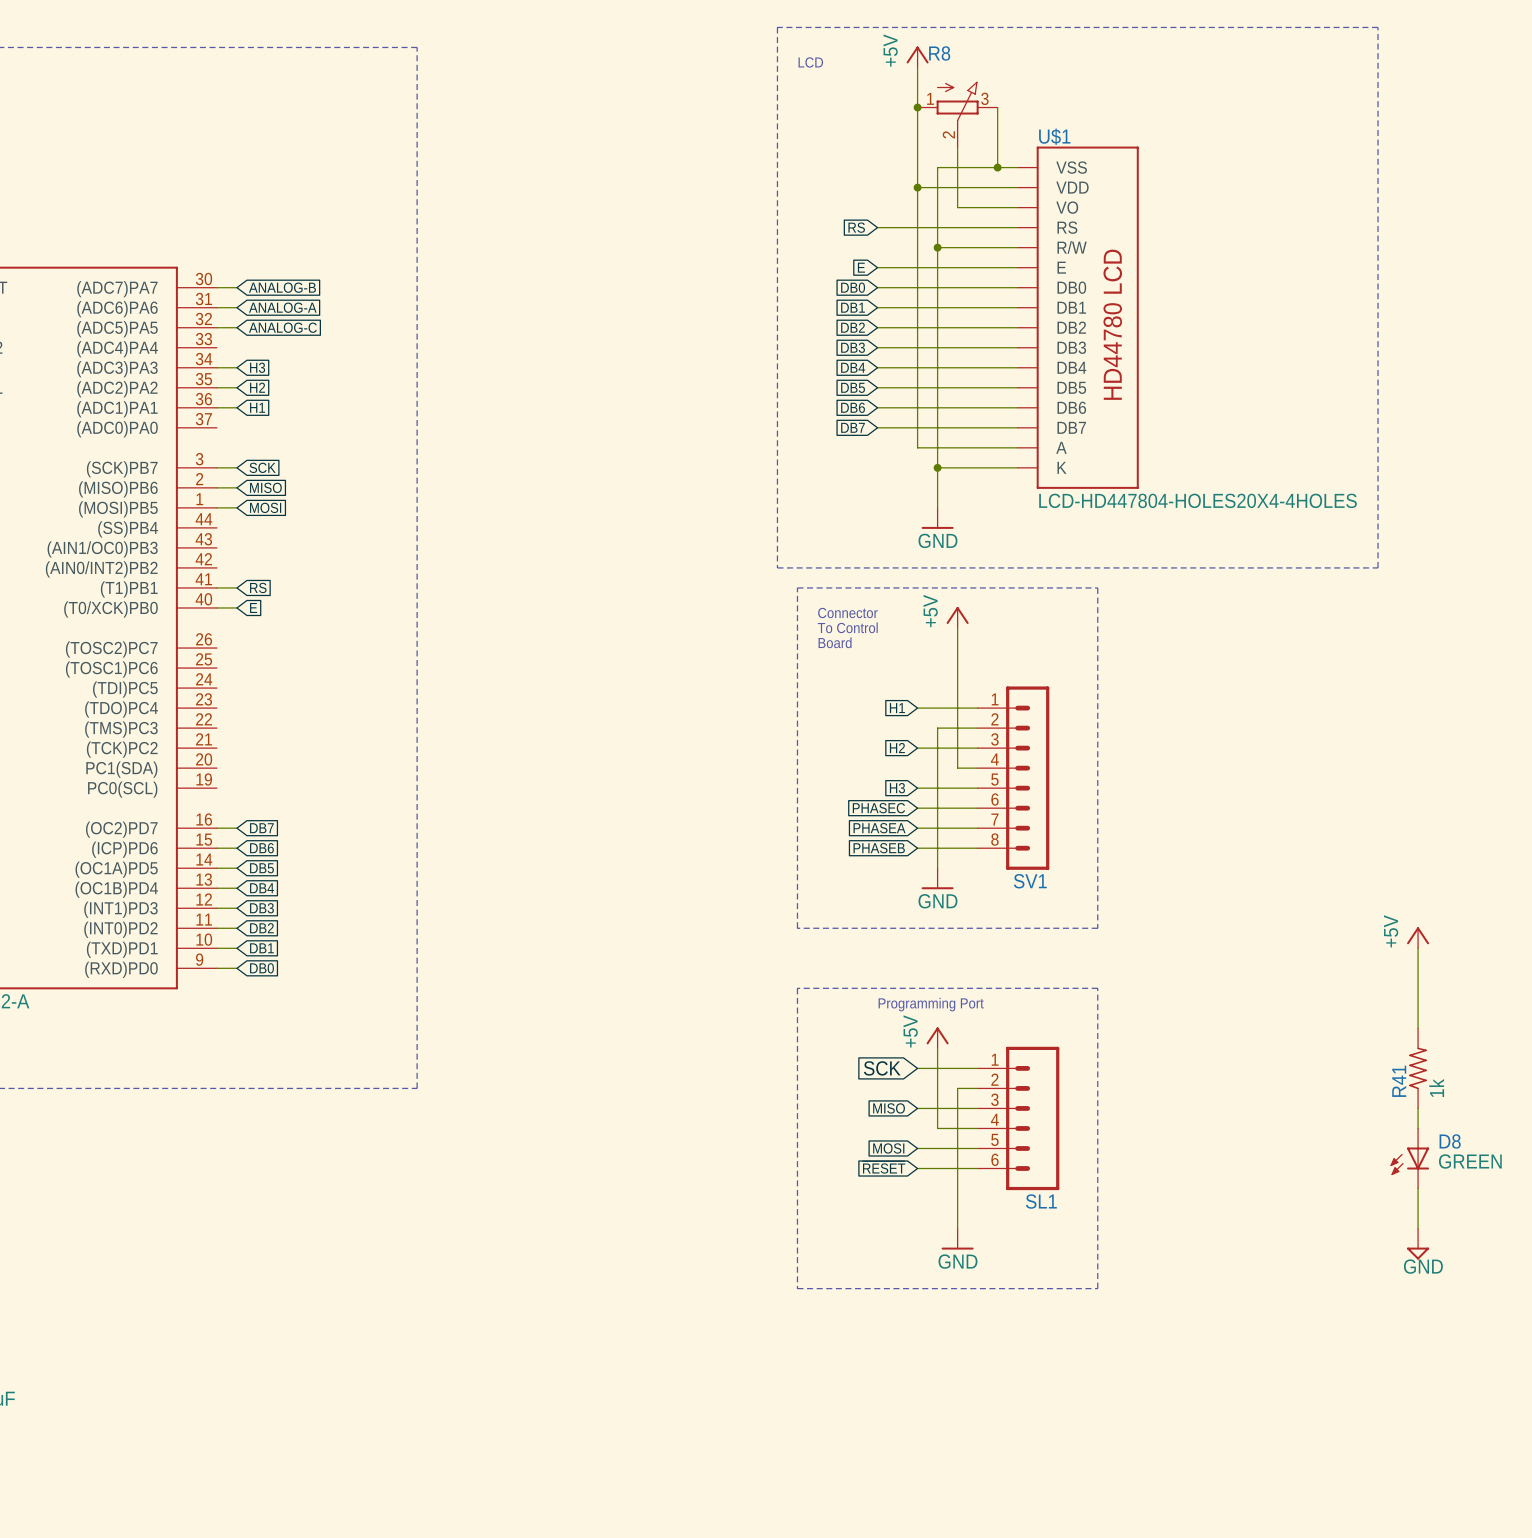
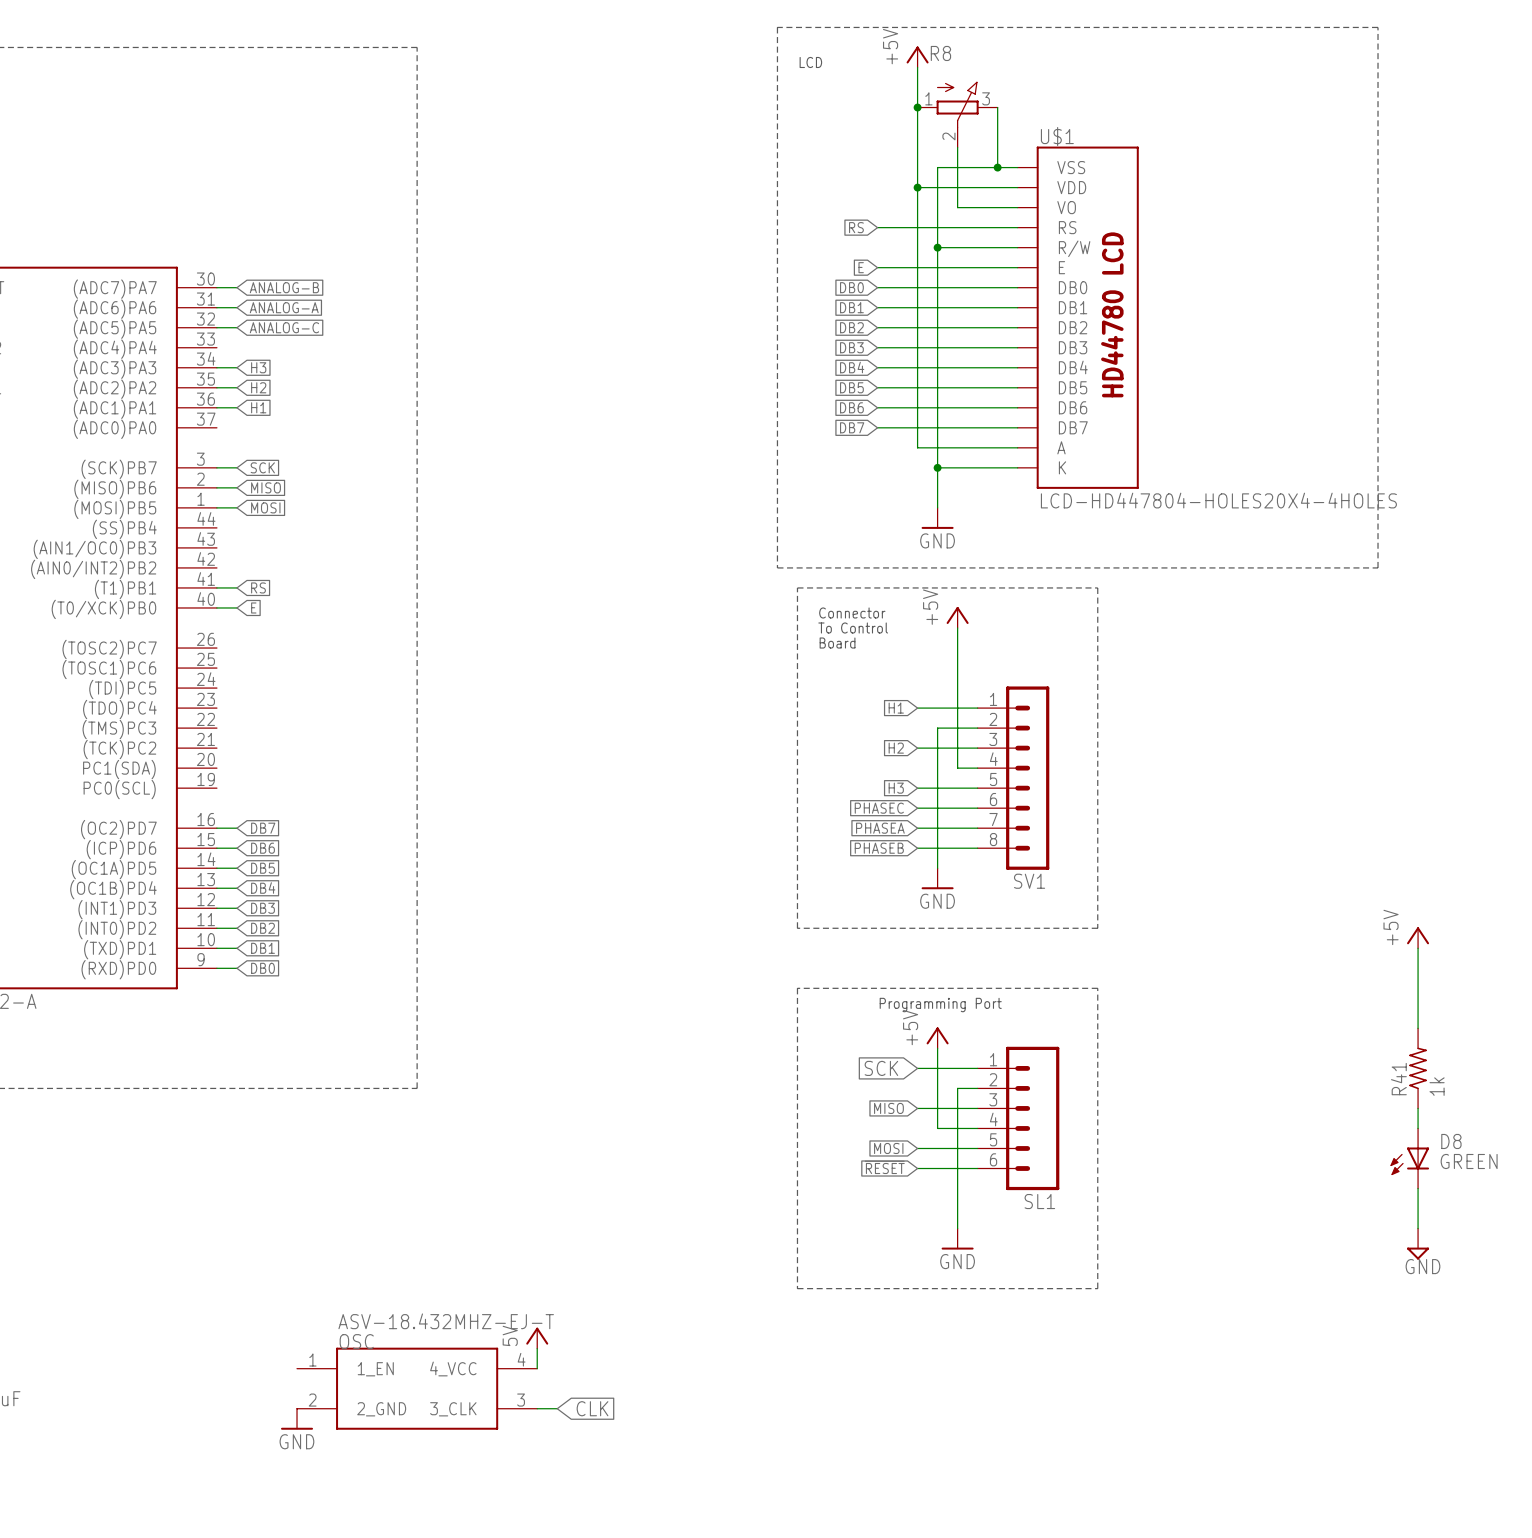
power symbol: none -> 5V (537, 1338)
wire: none -> (537, 1348) (537, 1368)
ASV-18.432MHZ-EJ-T: none -> OSC (417, 1388)
wire: none -> (537, 1408) (557, 1408)
global label: none -> CLK (592, 1408)
power symbol: none -> GND (297, 1419)

